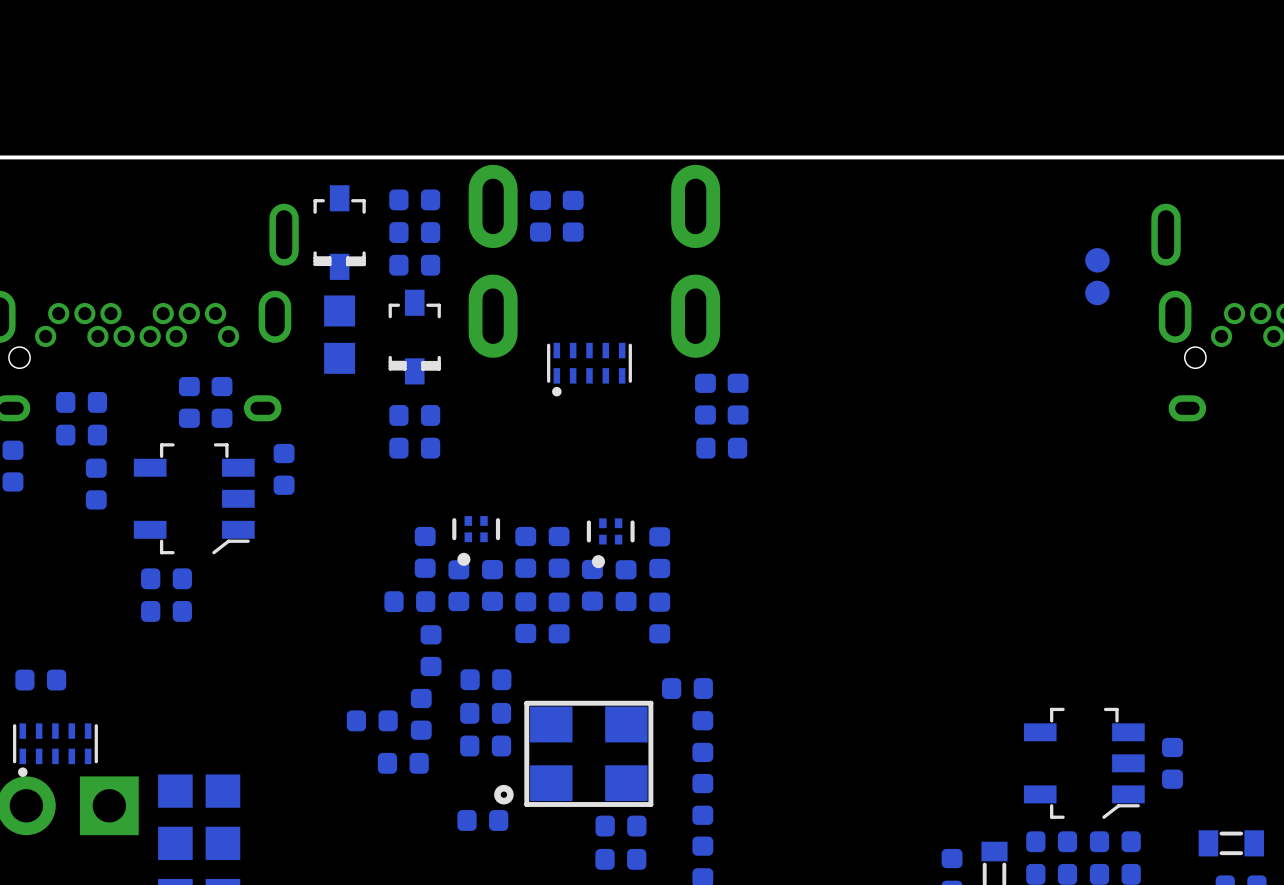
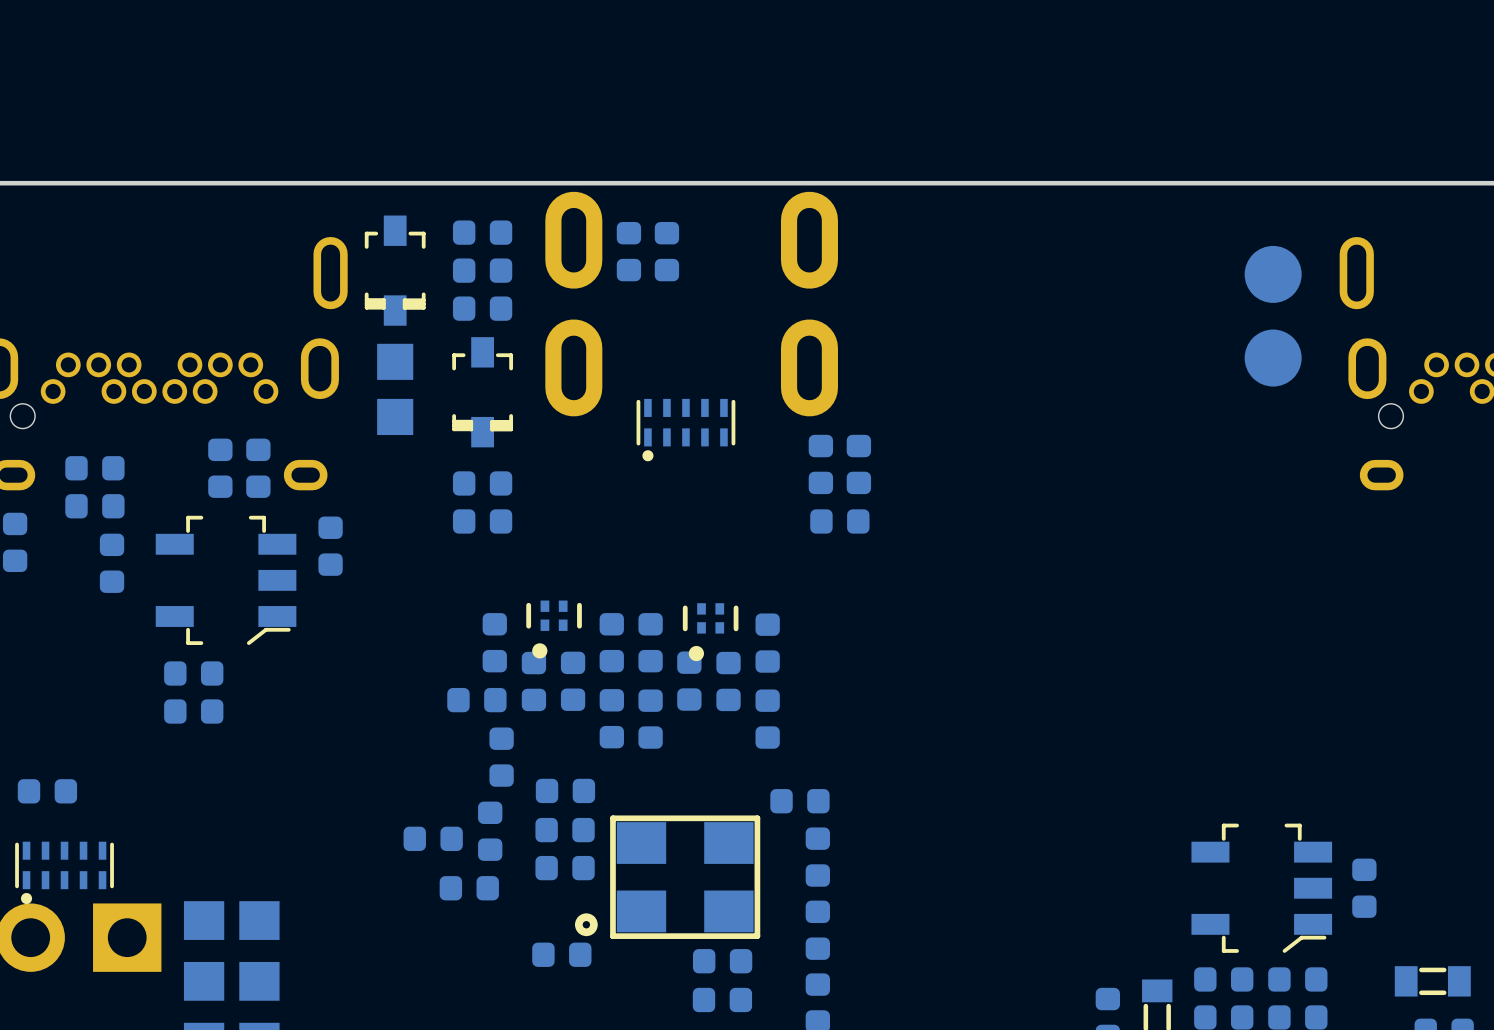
part: none -> (1273, 274)
part: (1097, 260) -> none
part footprint: [1085, 280, 1110, 306] -> [1244, 329, 1302, 387]

